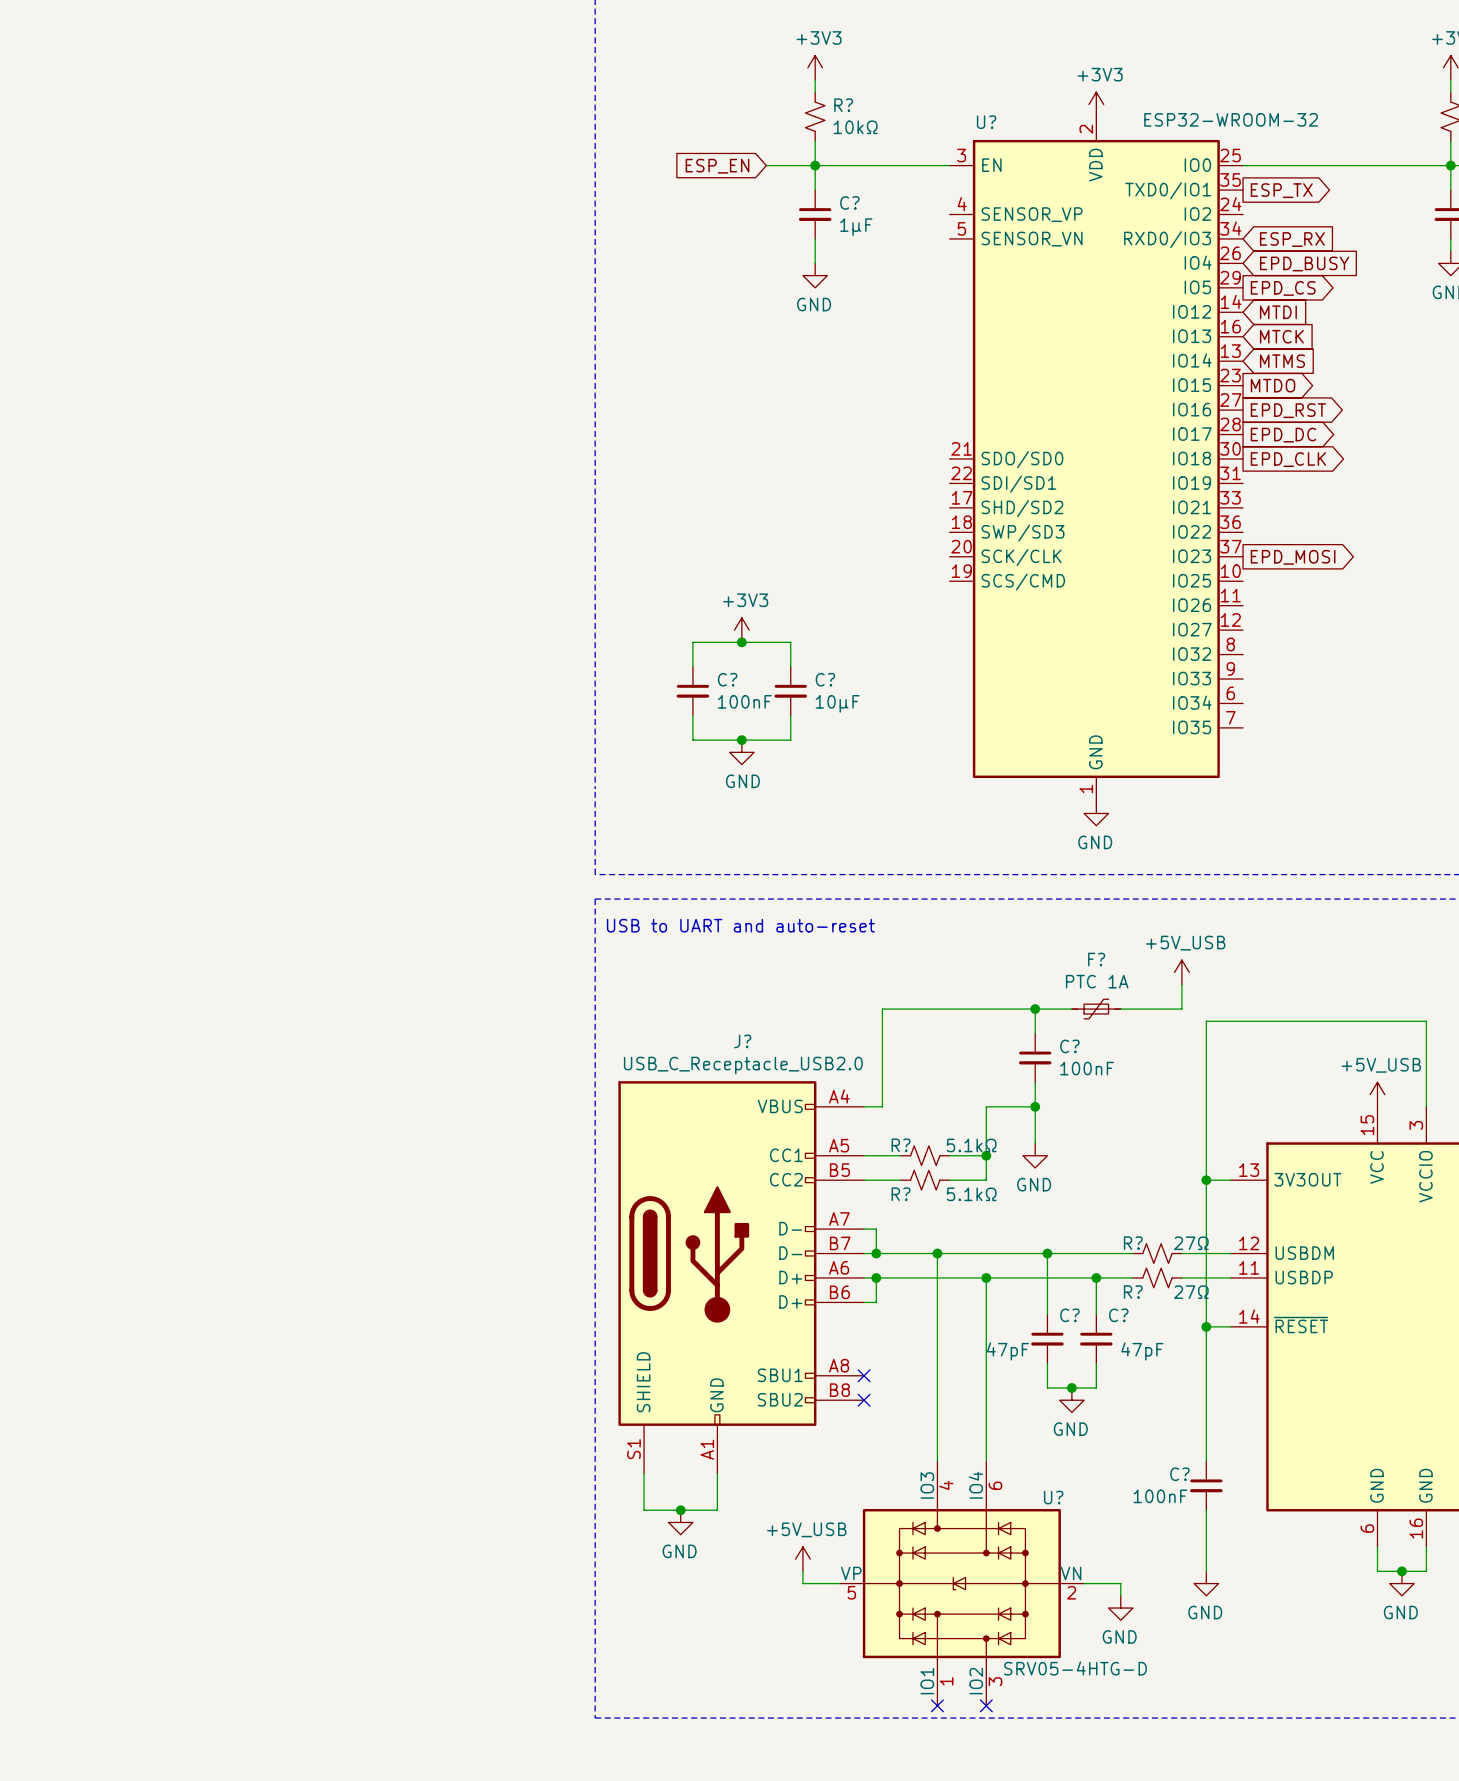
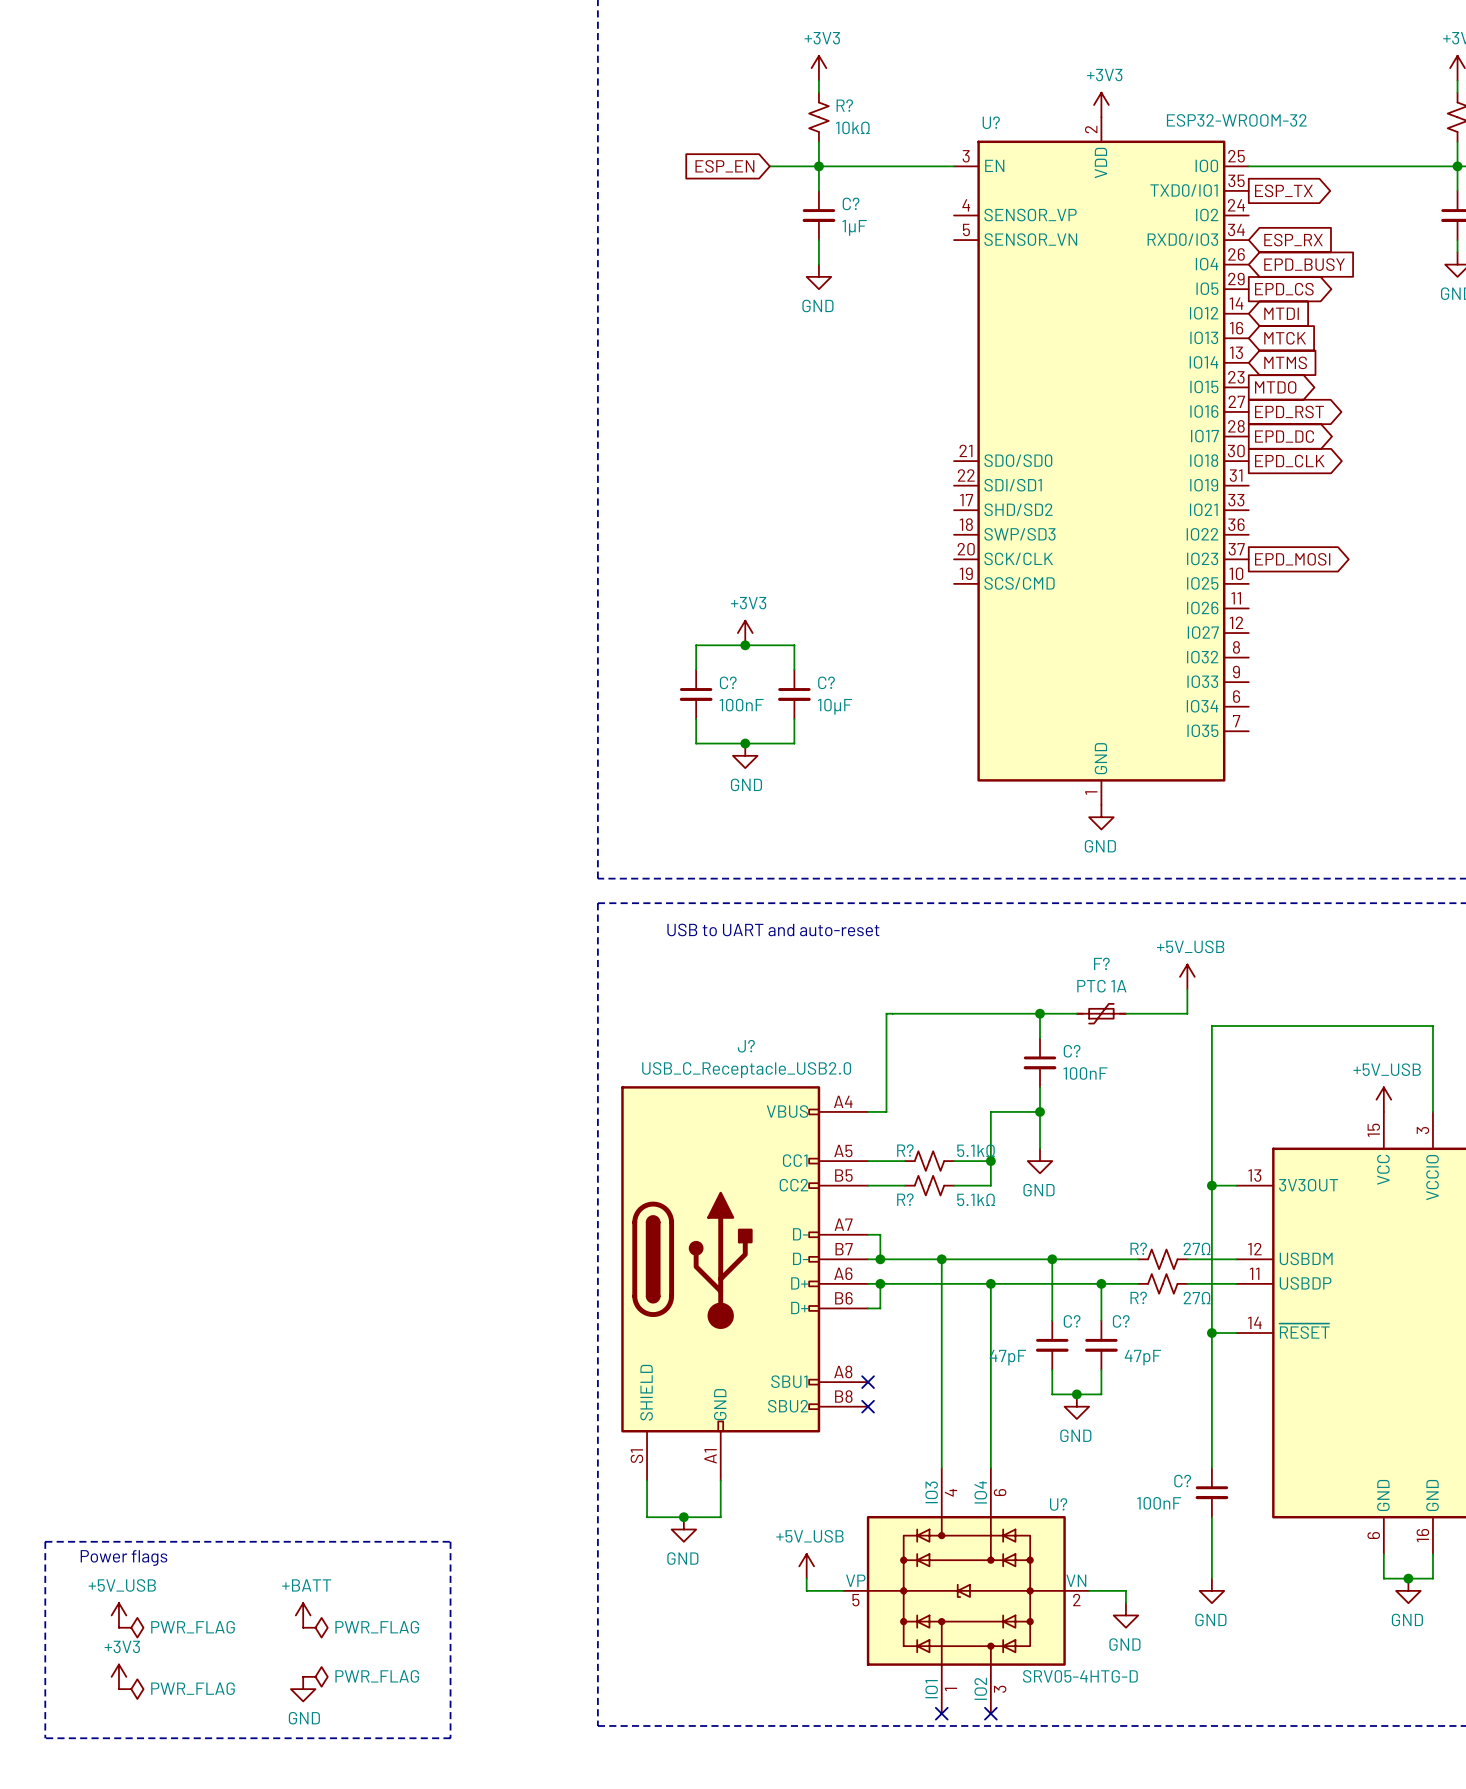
line: none -> (45, 1541) (45, 1738) (450, 1738) (450, 1541) (45, 1541)
text: none -> Power flags (123, 1558)
power symbol: none -> +5V_USB (118, 1615)
power symbol: none -> +BATT (303, 1615)
power symbol: none -> PWR_FLAG (131, 1627)
power symbol: none -> PWR_FLAG (315, 1627)
power symbol: none -> +3V3 (118, 1676)
power symbol: none -> PWR_FLAG (315, 1676)
power symbol: none -> PWR_FLAG (131, 1689)
power symbol: none -> GND (303, 1689)

